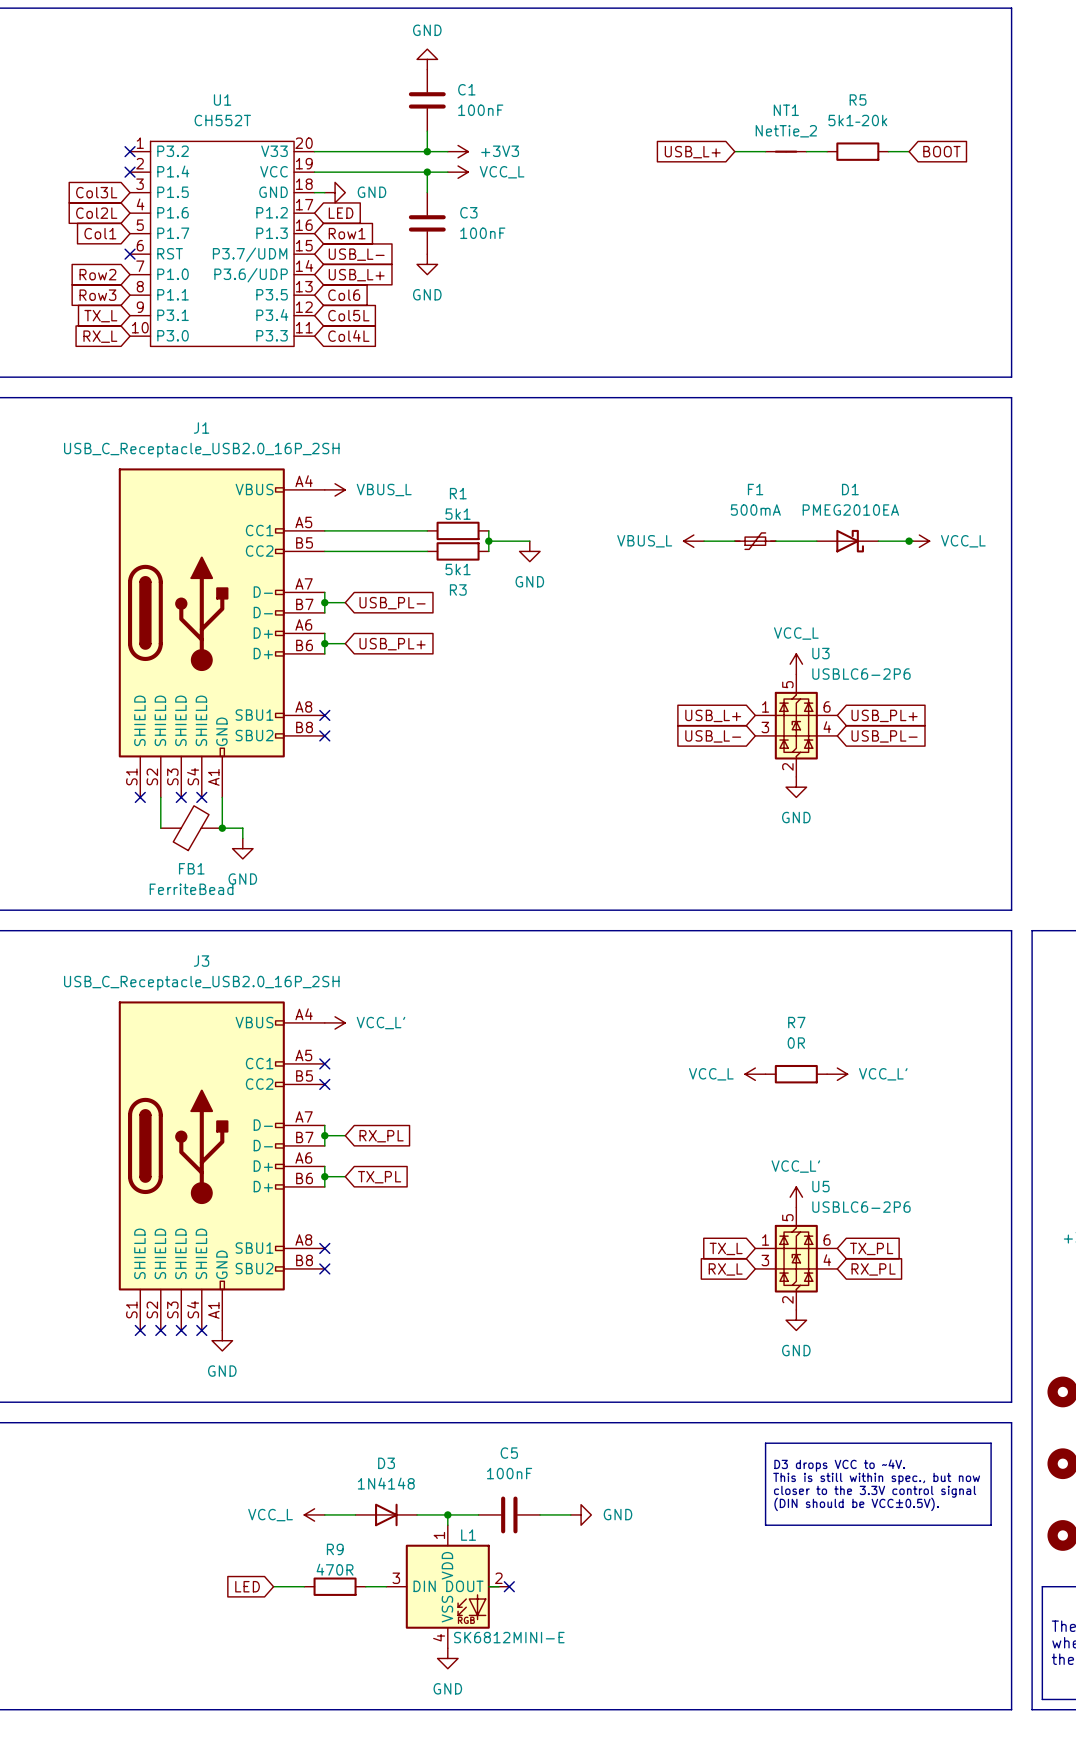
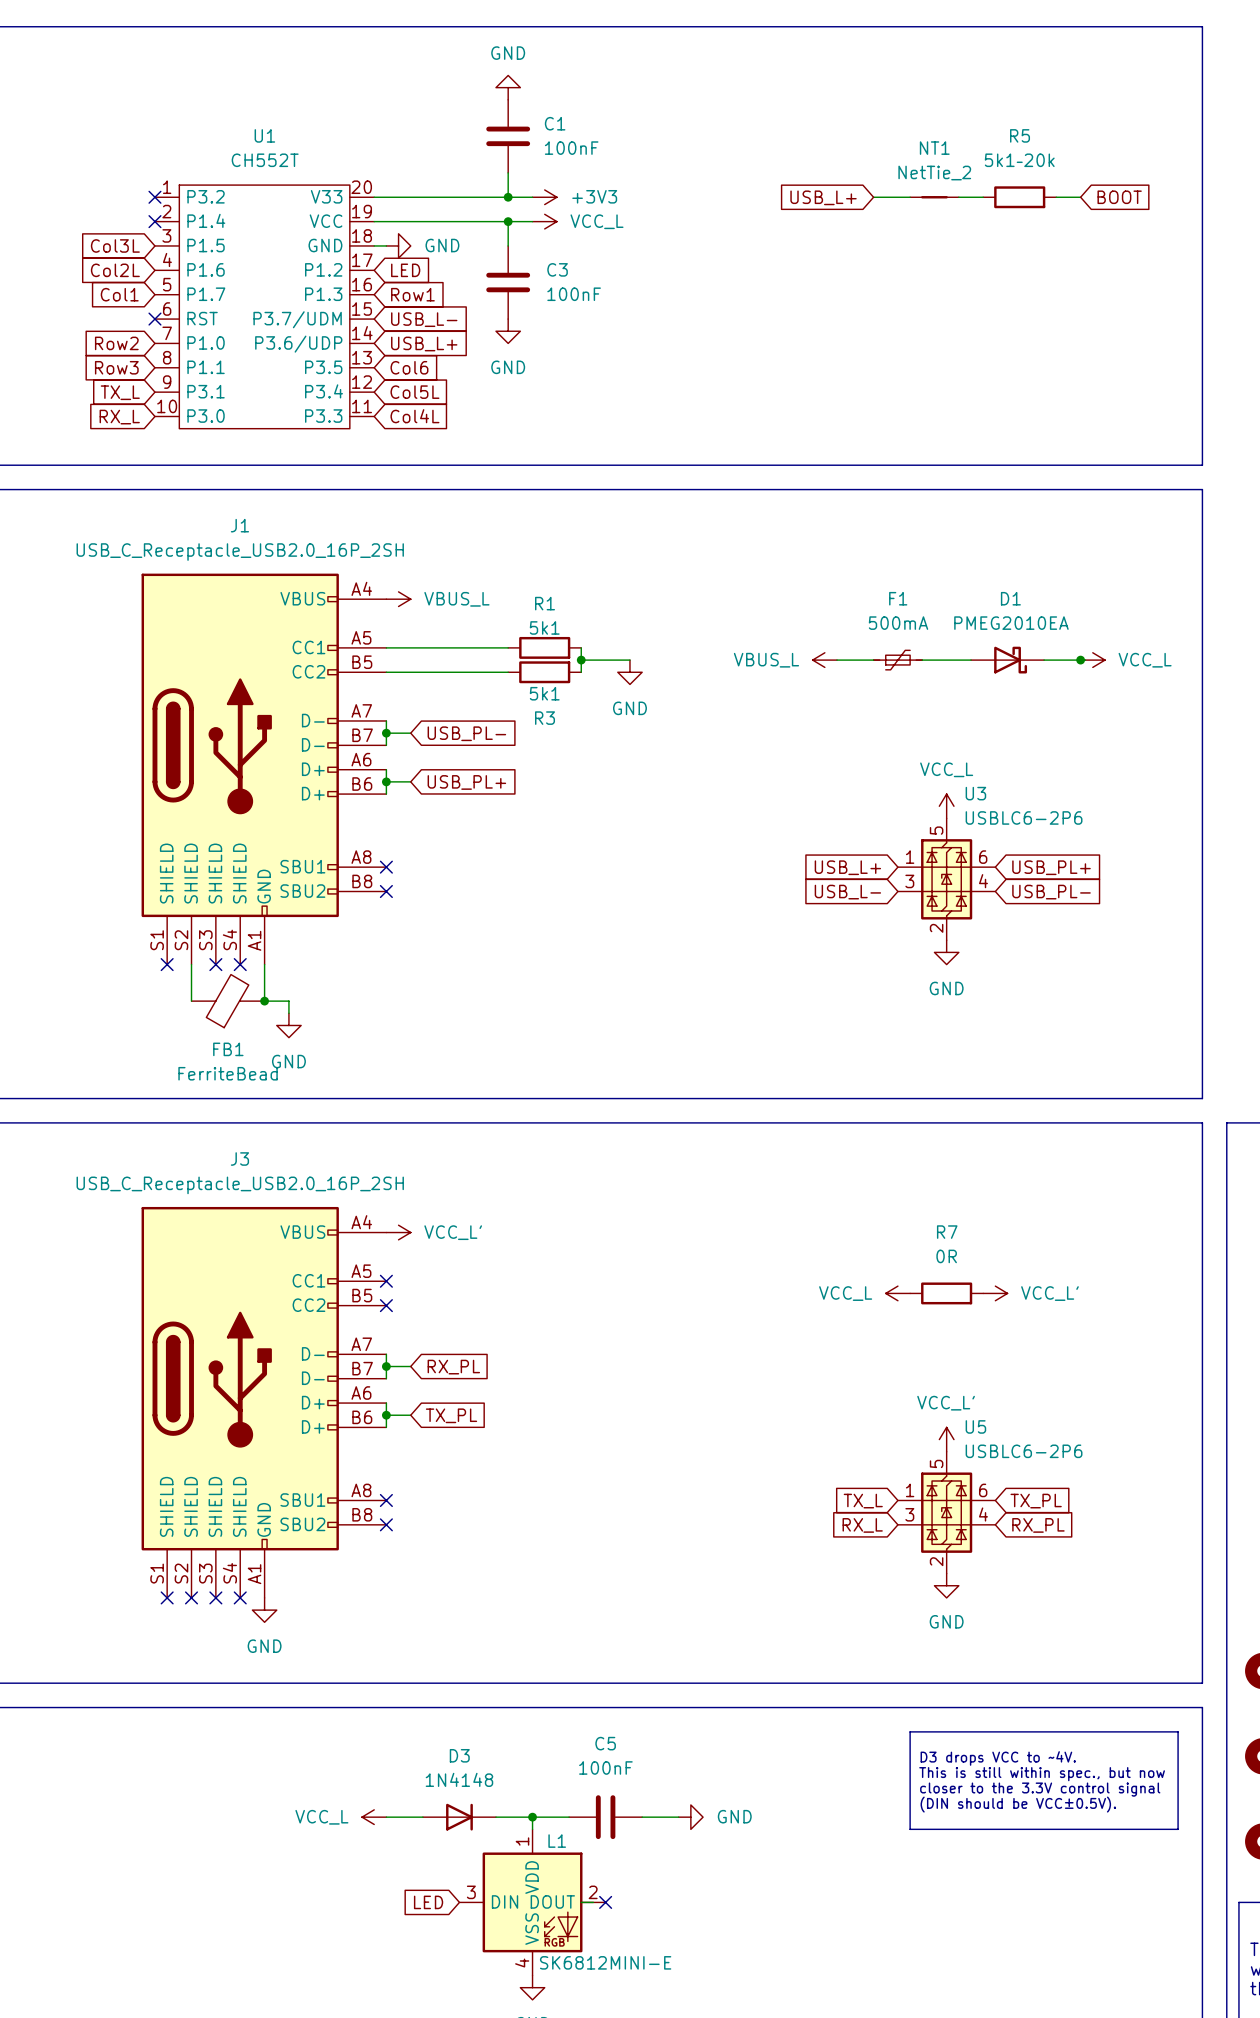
global label position: LED (247, 1586) -> LED (428, 1902)
wire: (273, 1586) (304, 1586) -> none
R9: 470R (335, 1586) -> none
wire: (365, 1586) (386, 1586) -> none

